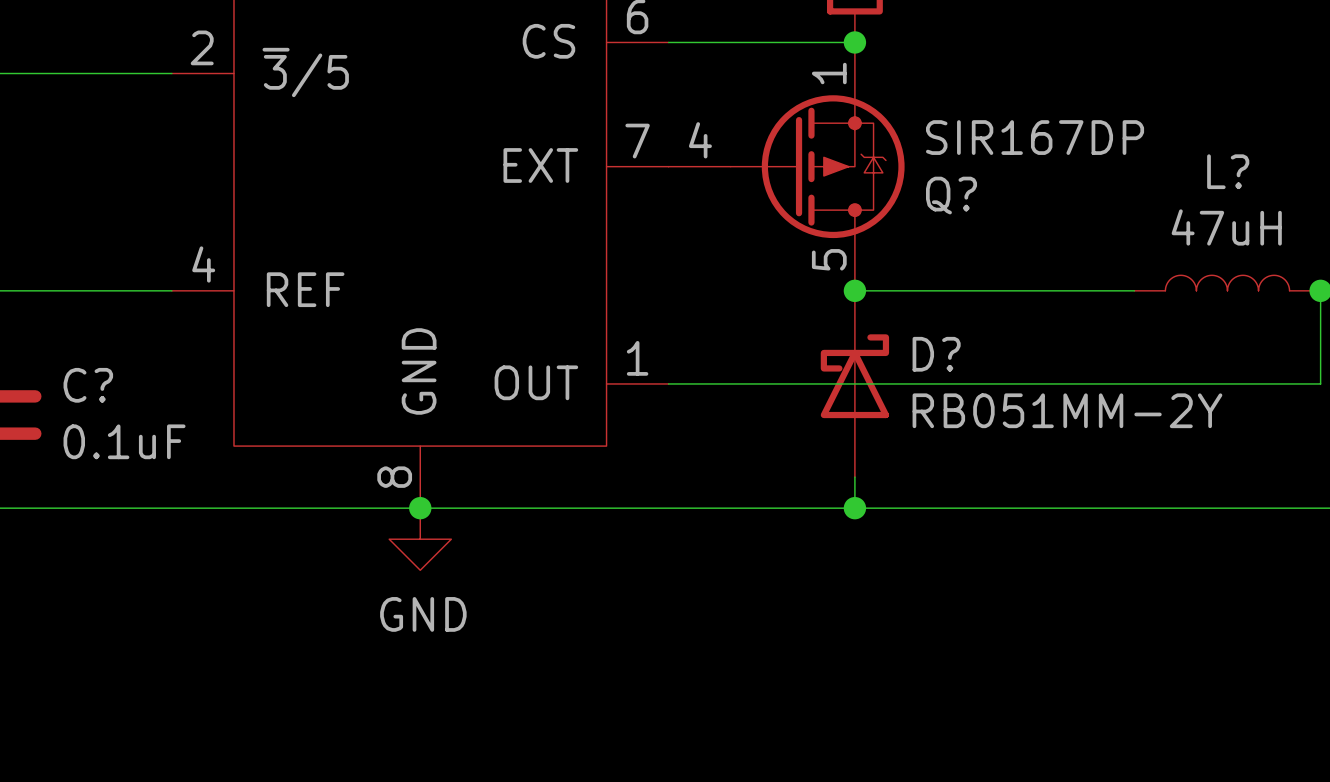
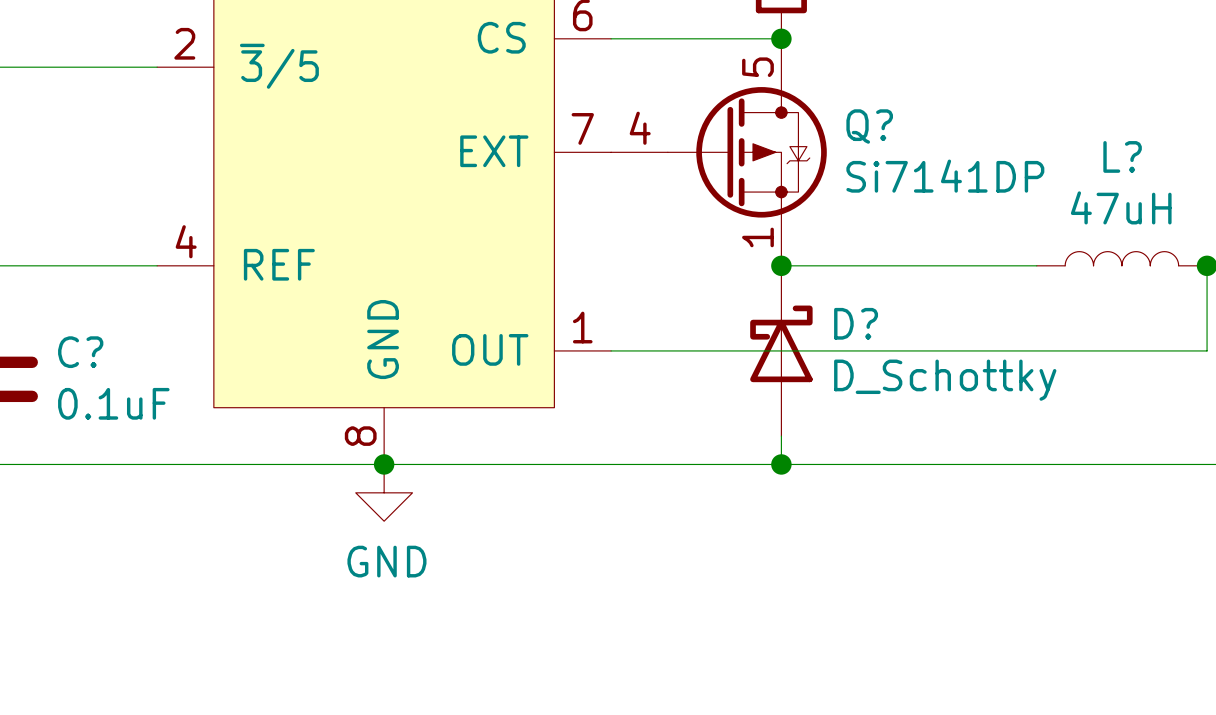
Q? value: SIR167DP (1035, 137) -> Si7141DP (945, 176)
Q? flip: as is (817, 166) -> up-down (747, 152)
D? value: RB051MM-2Y (1067, 410) -> D_Schottky (945, 380)

